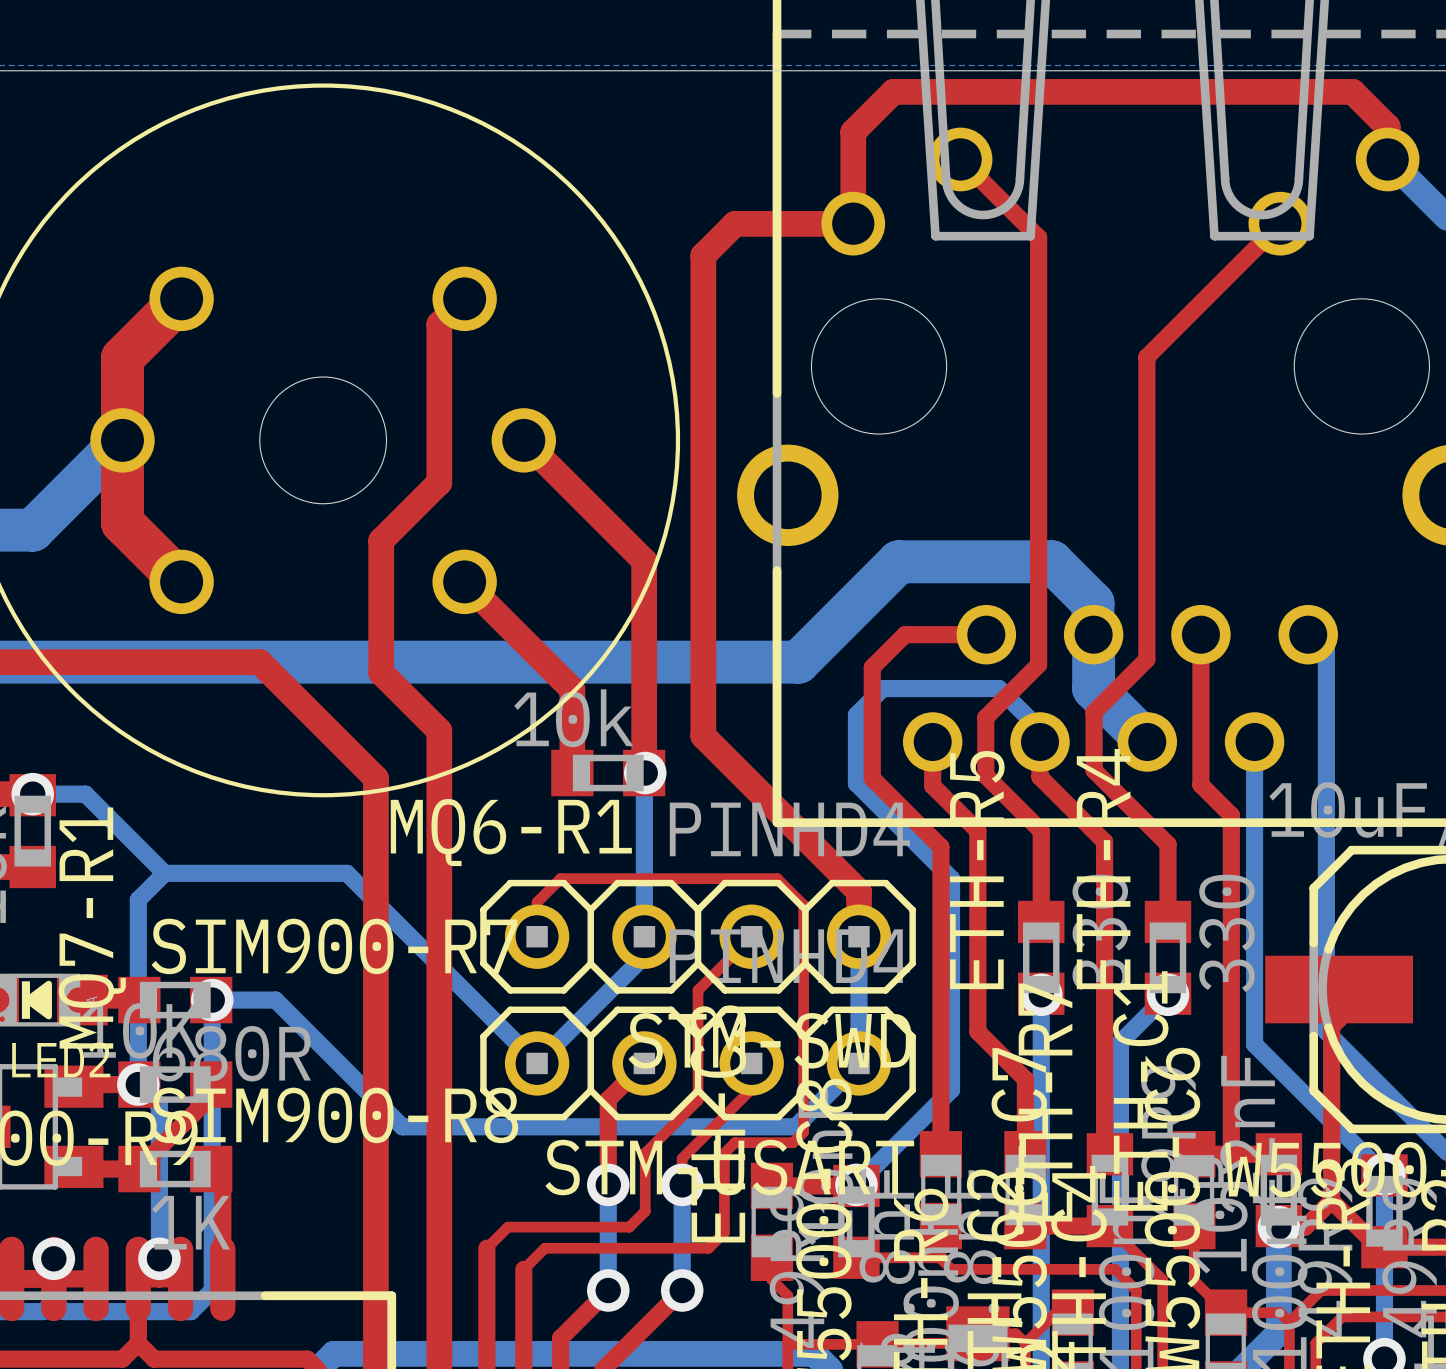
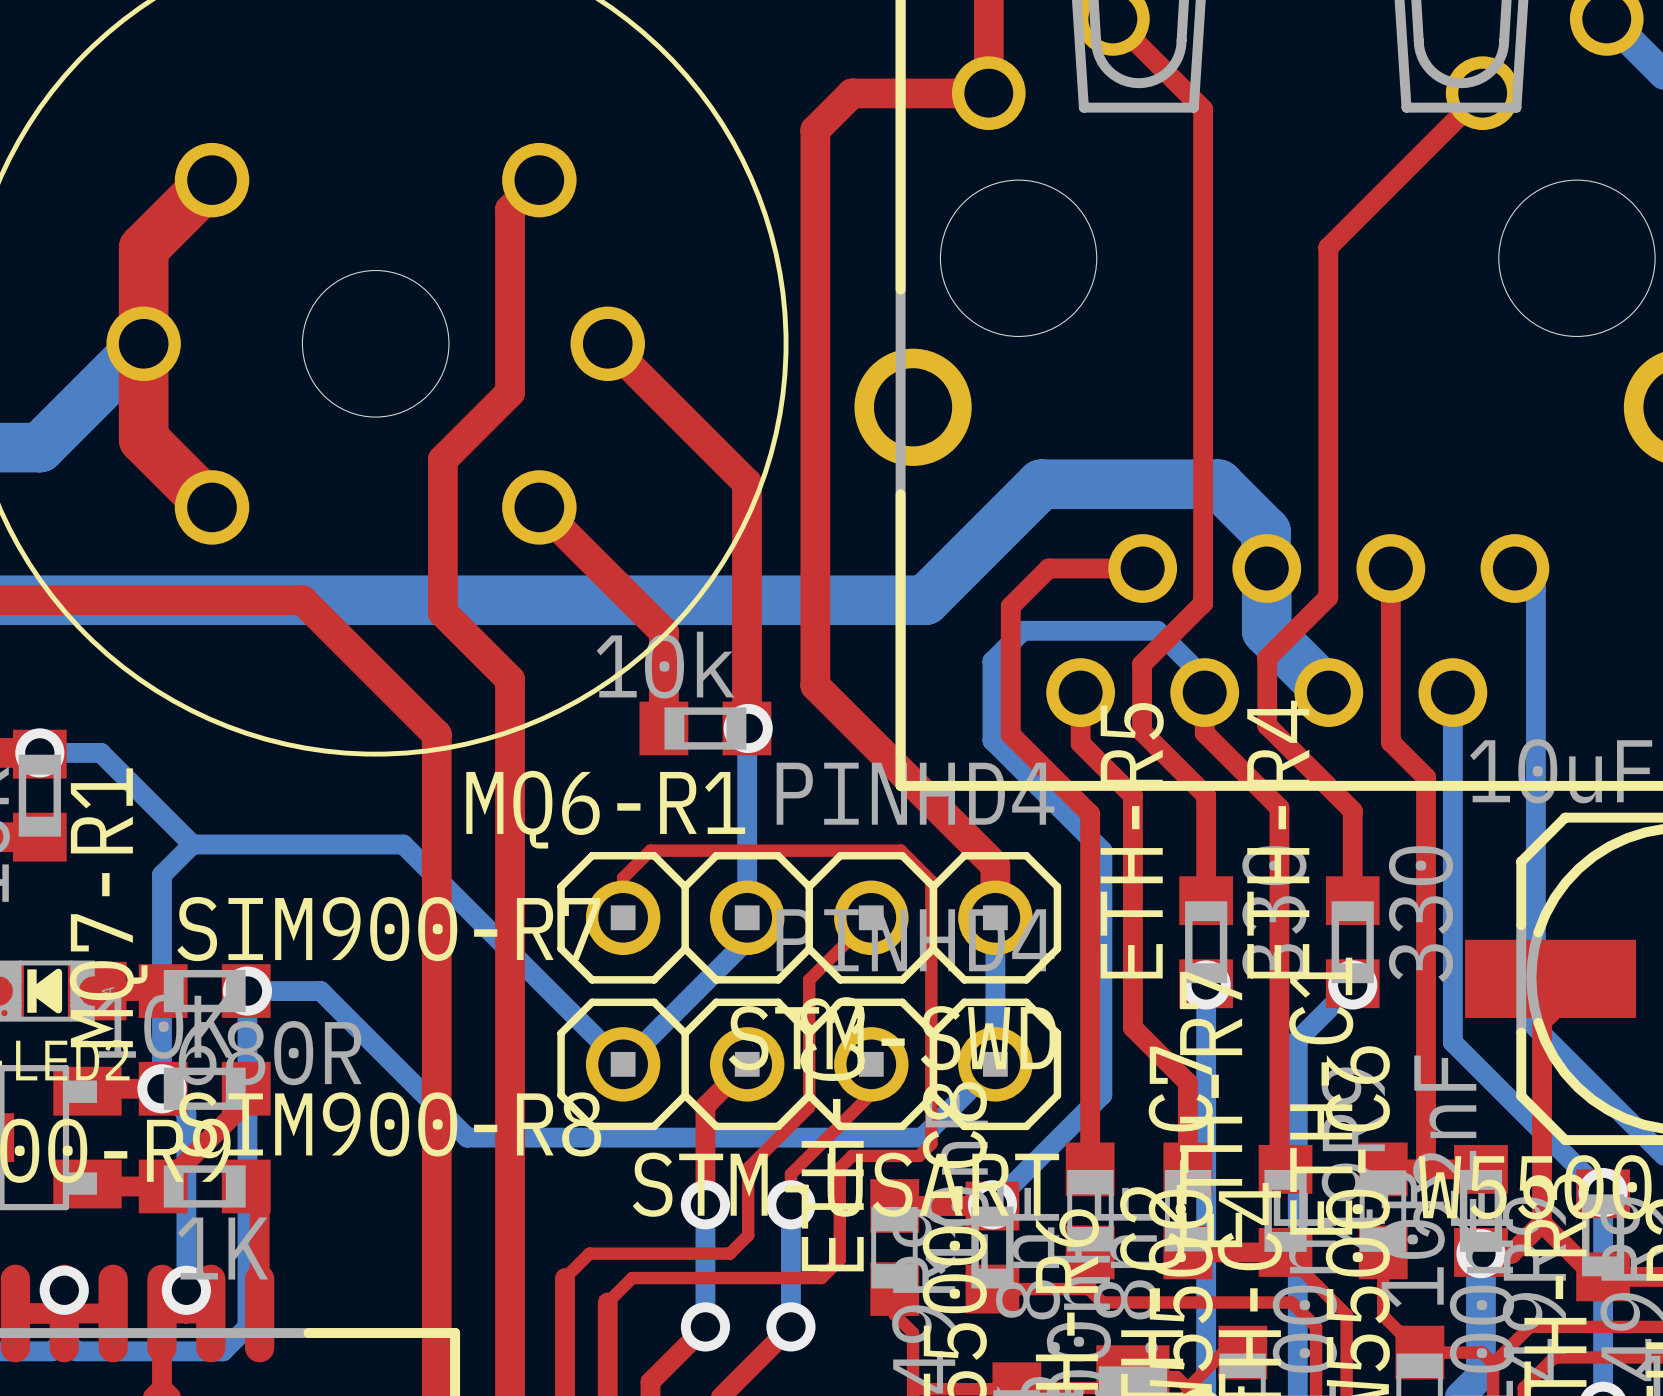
MQ6-R1 name position: MQ6-R1 (511, 832) -> MQ6-R1 (605, 809)

